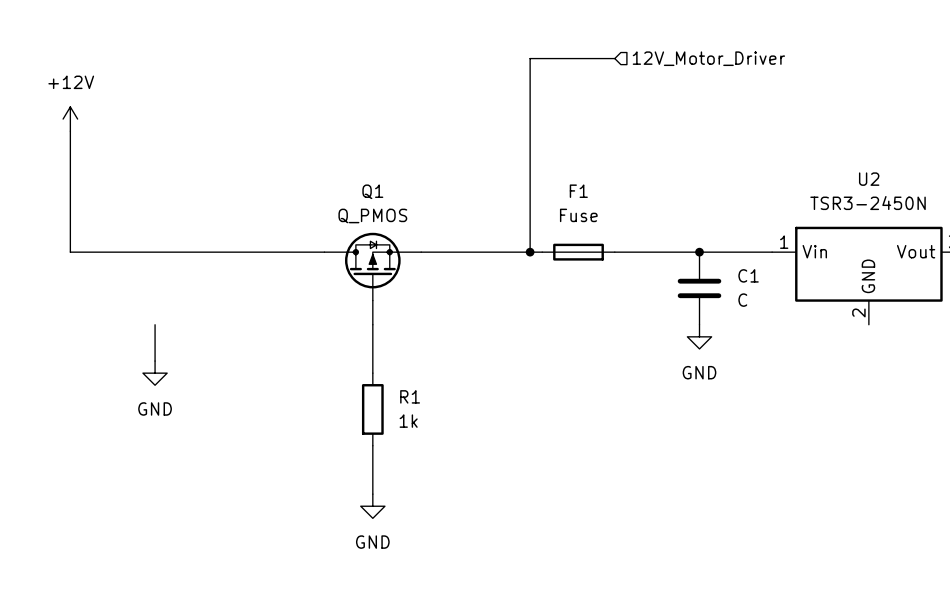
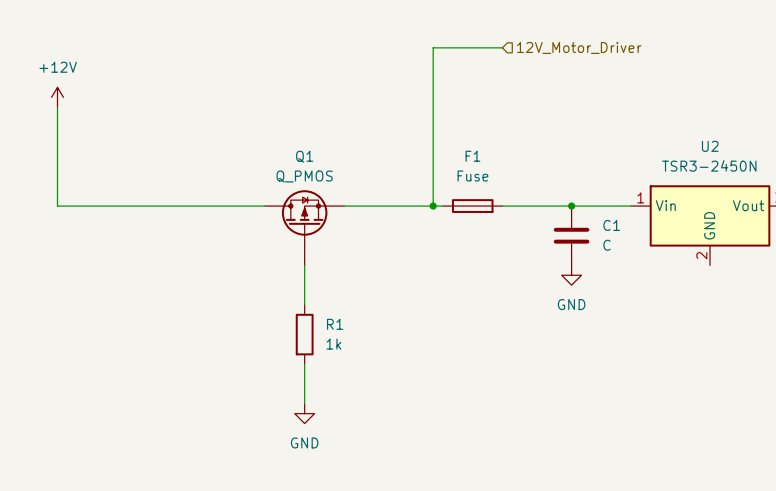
wire: (155, 324) (155, 361) -> none
power symbol: GND (155, 373) -> none

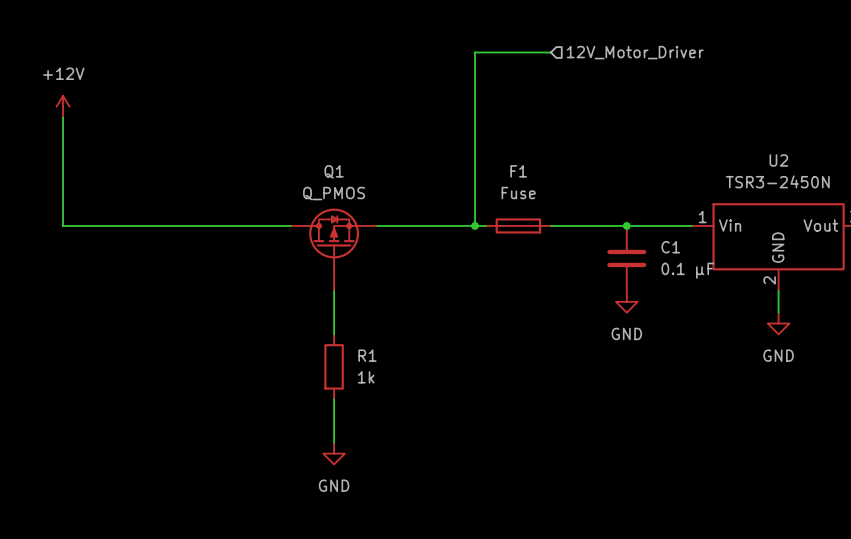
C1 value: C (606, 245) -> 0.1 µF (687, 270)
wire: none -> (778, 291) (778, 312)
power symbol: none -> GND (778, 323)

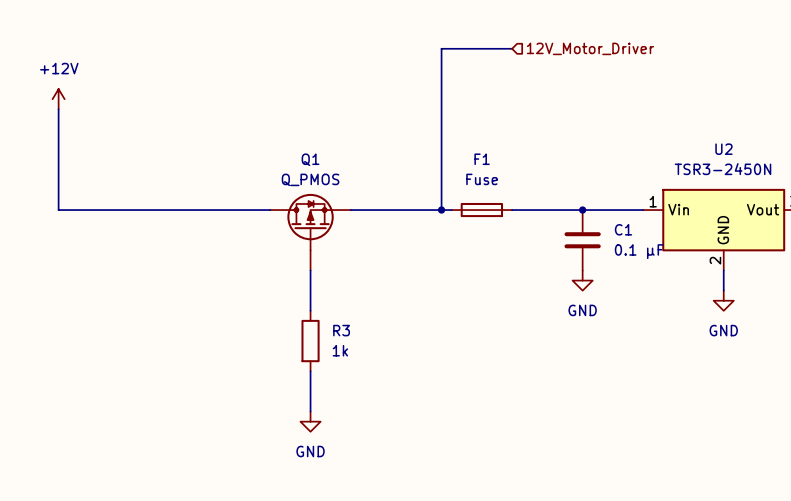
R1 name: R1 (367, 355) -> R3 (341, 330)

